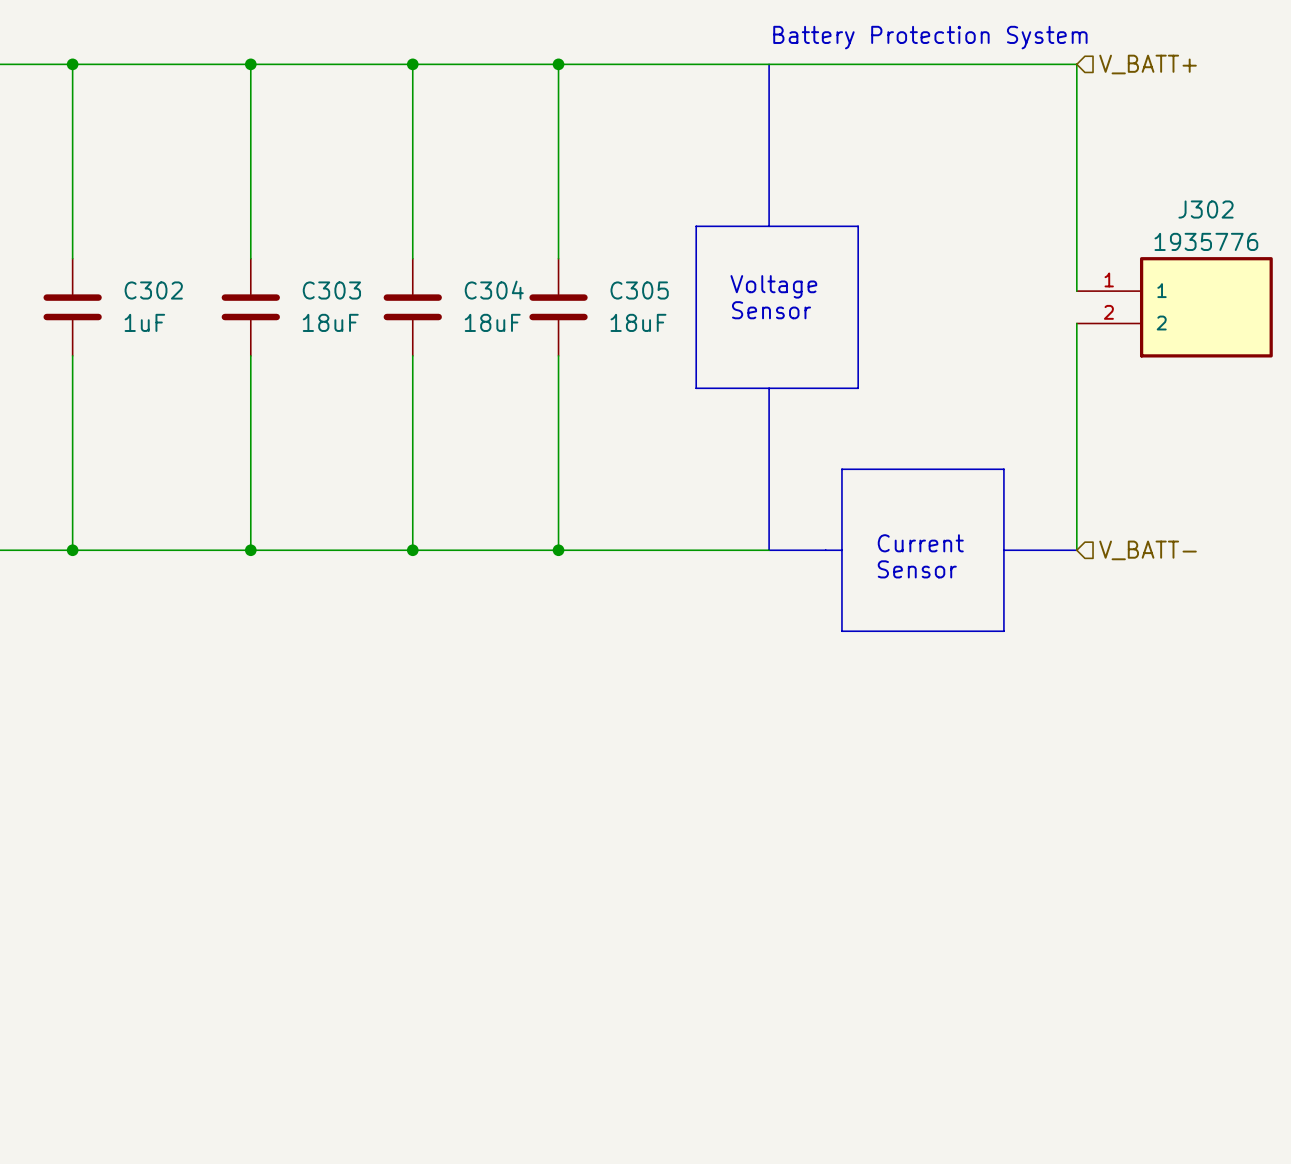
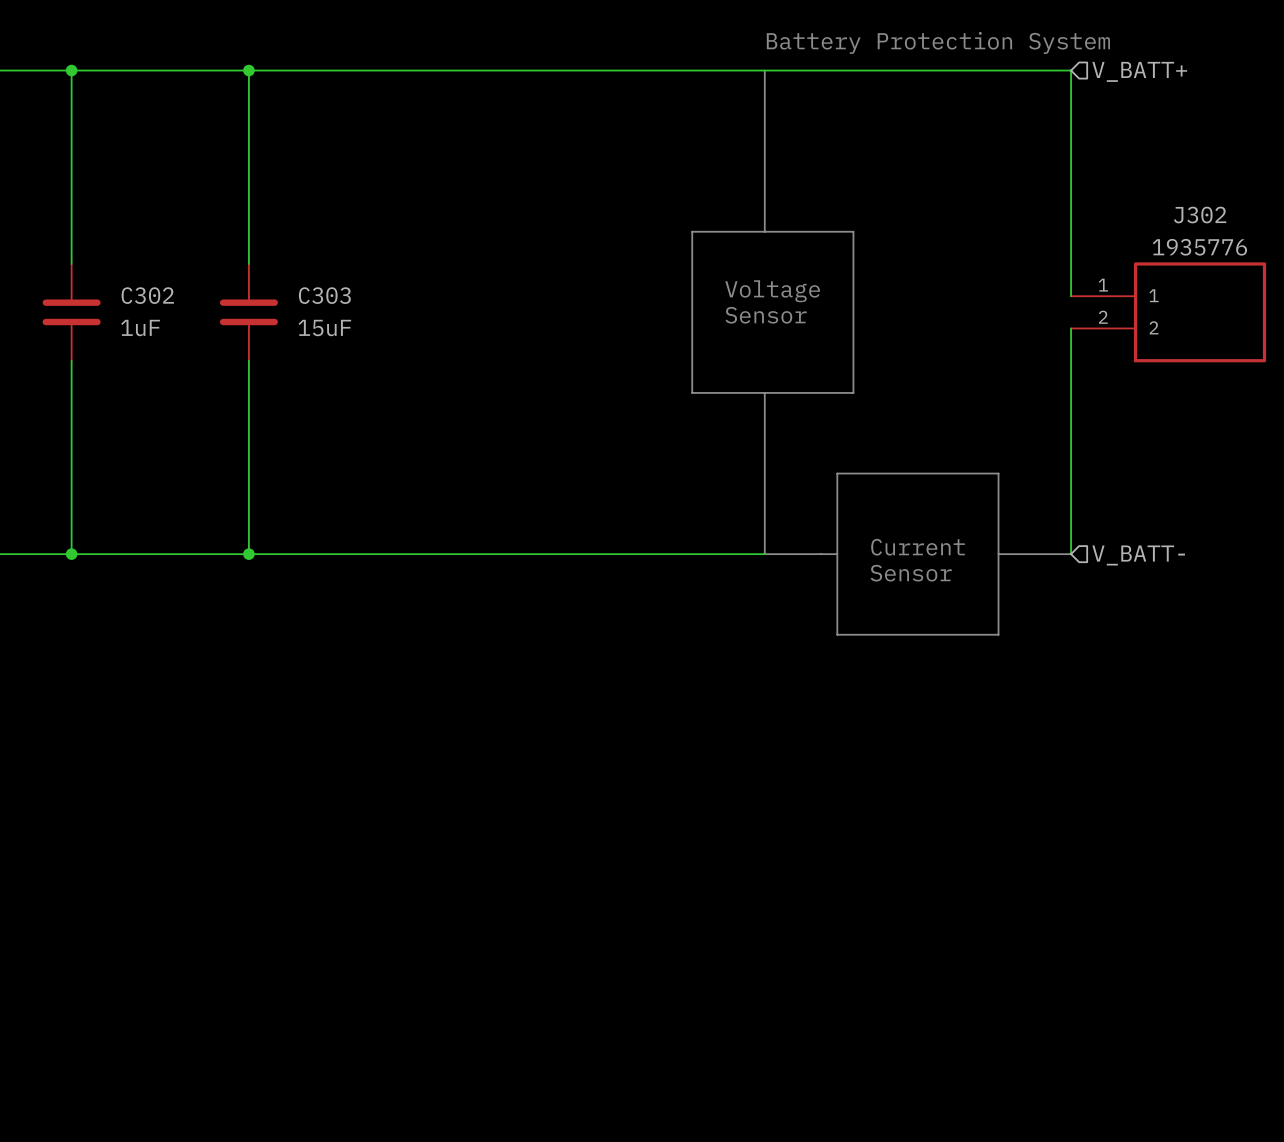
wire: (412, 64) (412, 258) -> none
junction: (412, 64) -> none
wire: (558, 64) (558, 258) -> none
junction: (558, 64) -> none
C304: 18uF (412, 307) -> none
C305: 18uF (558, 307) -> none
C303 value: 18uF (330, 322) -> 15uF (324, 327)
wire: (412, 355) (412, 550) -> none
wire: (558, 355) (558, 550) -> none
junction: (412, 550) -> none
junction: (558, 550) -> none

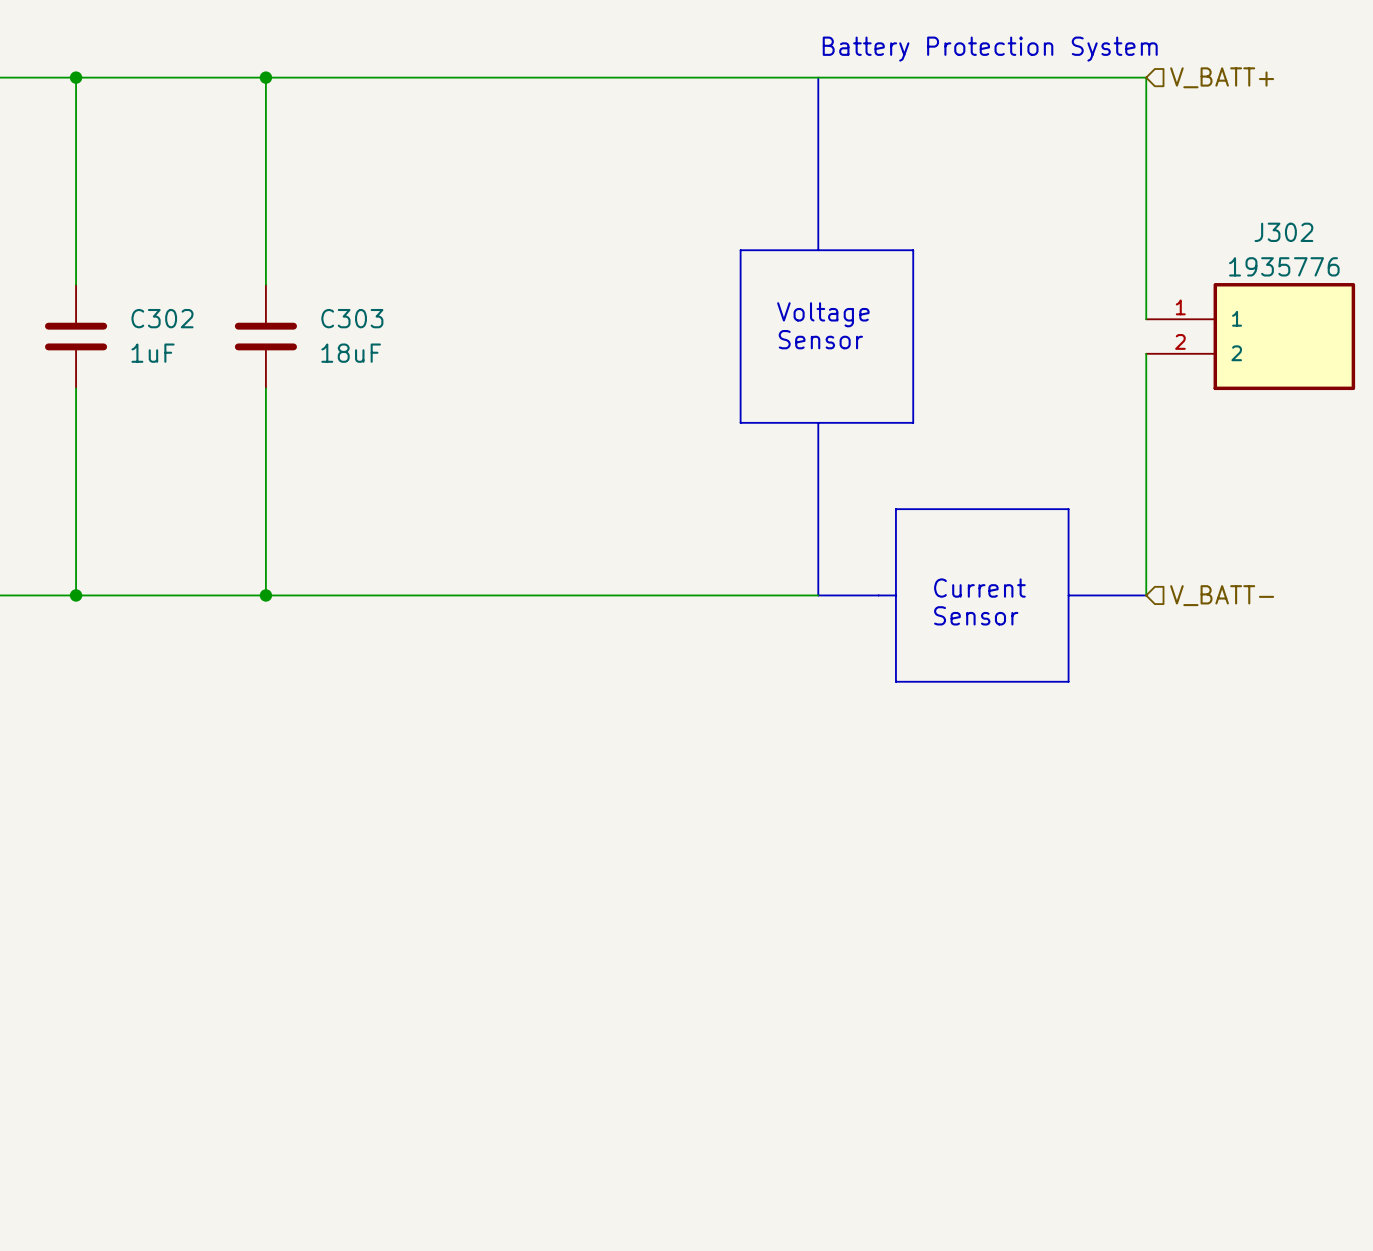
C303 value: 15uF (324, 327) -> 18uF (351, 353)

